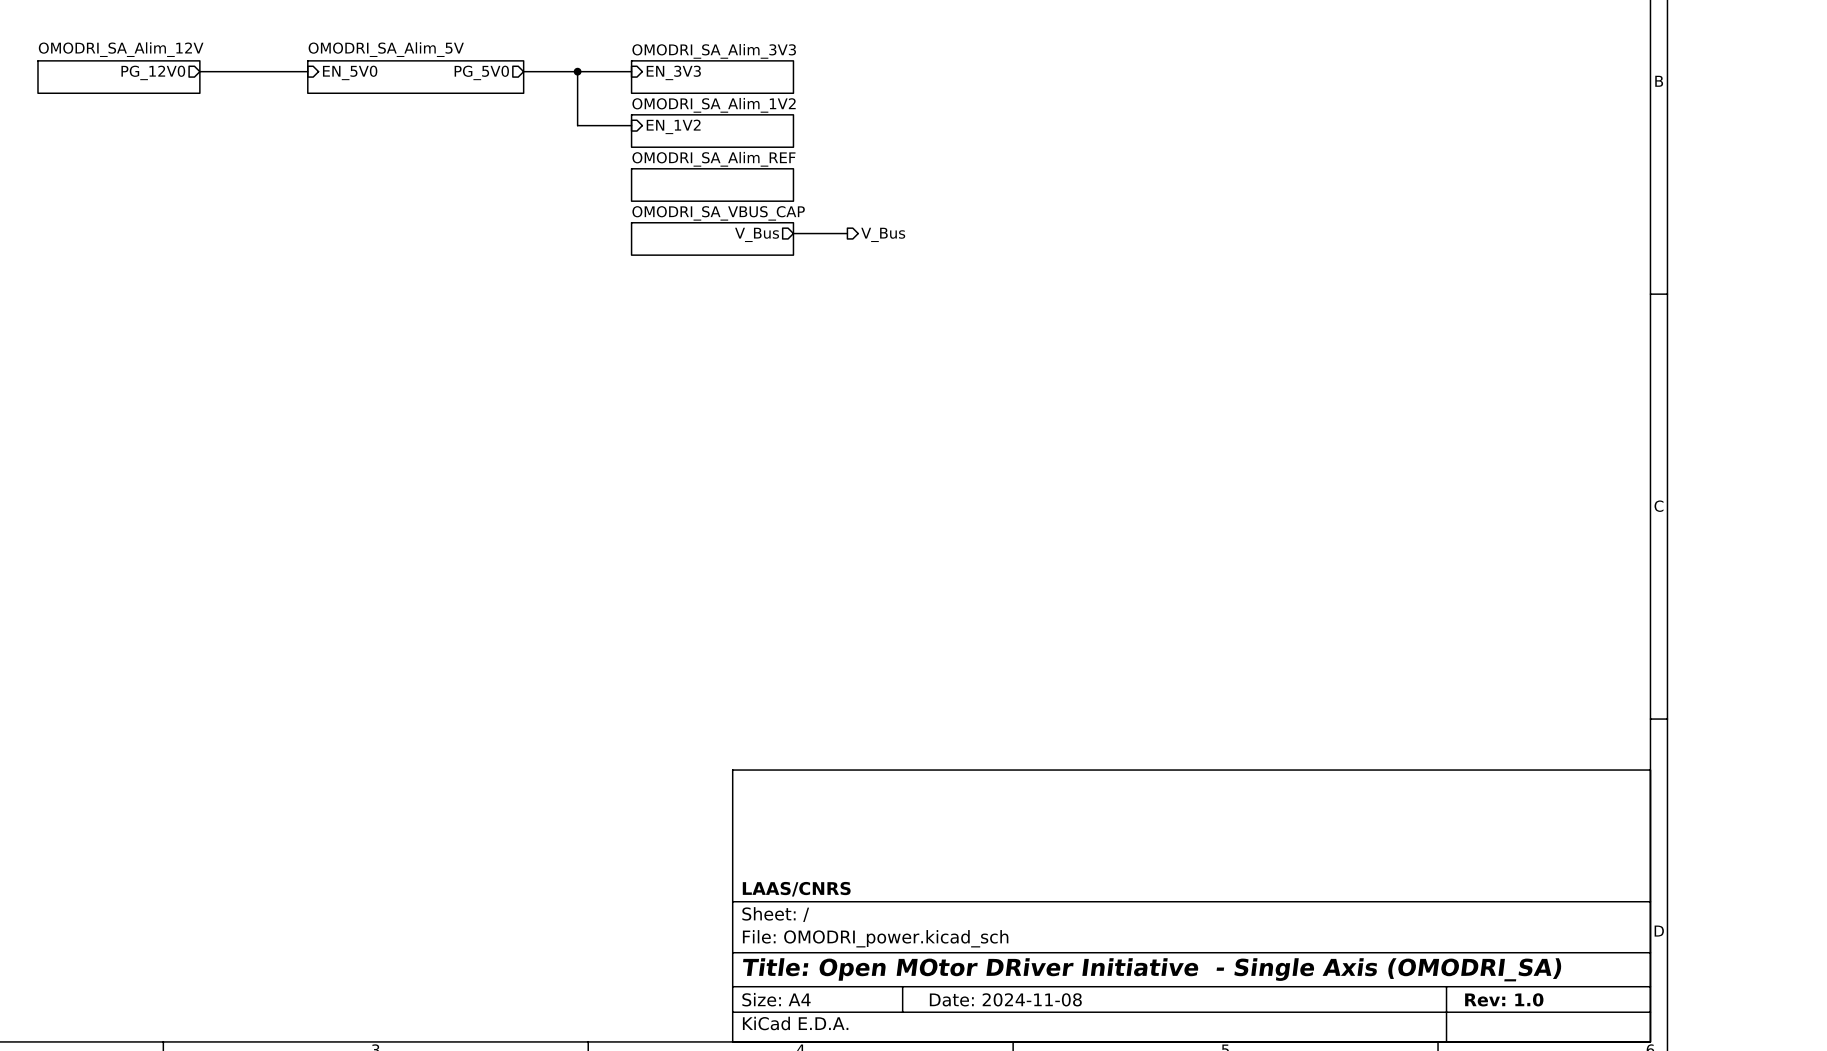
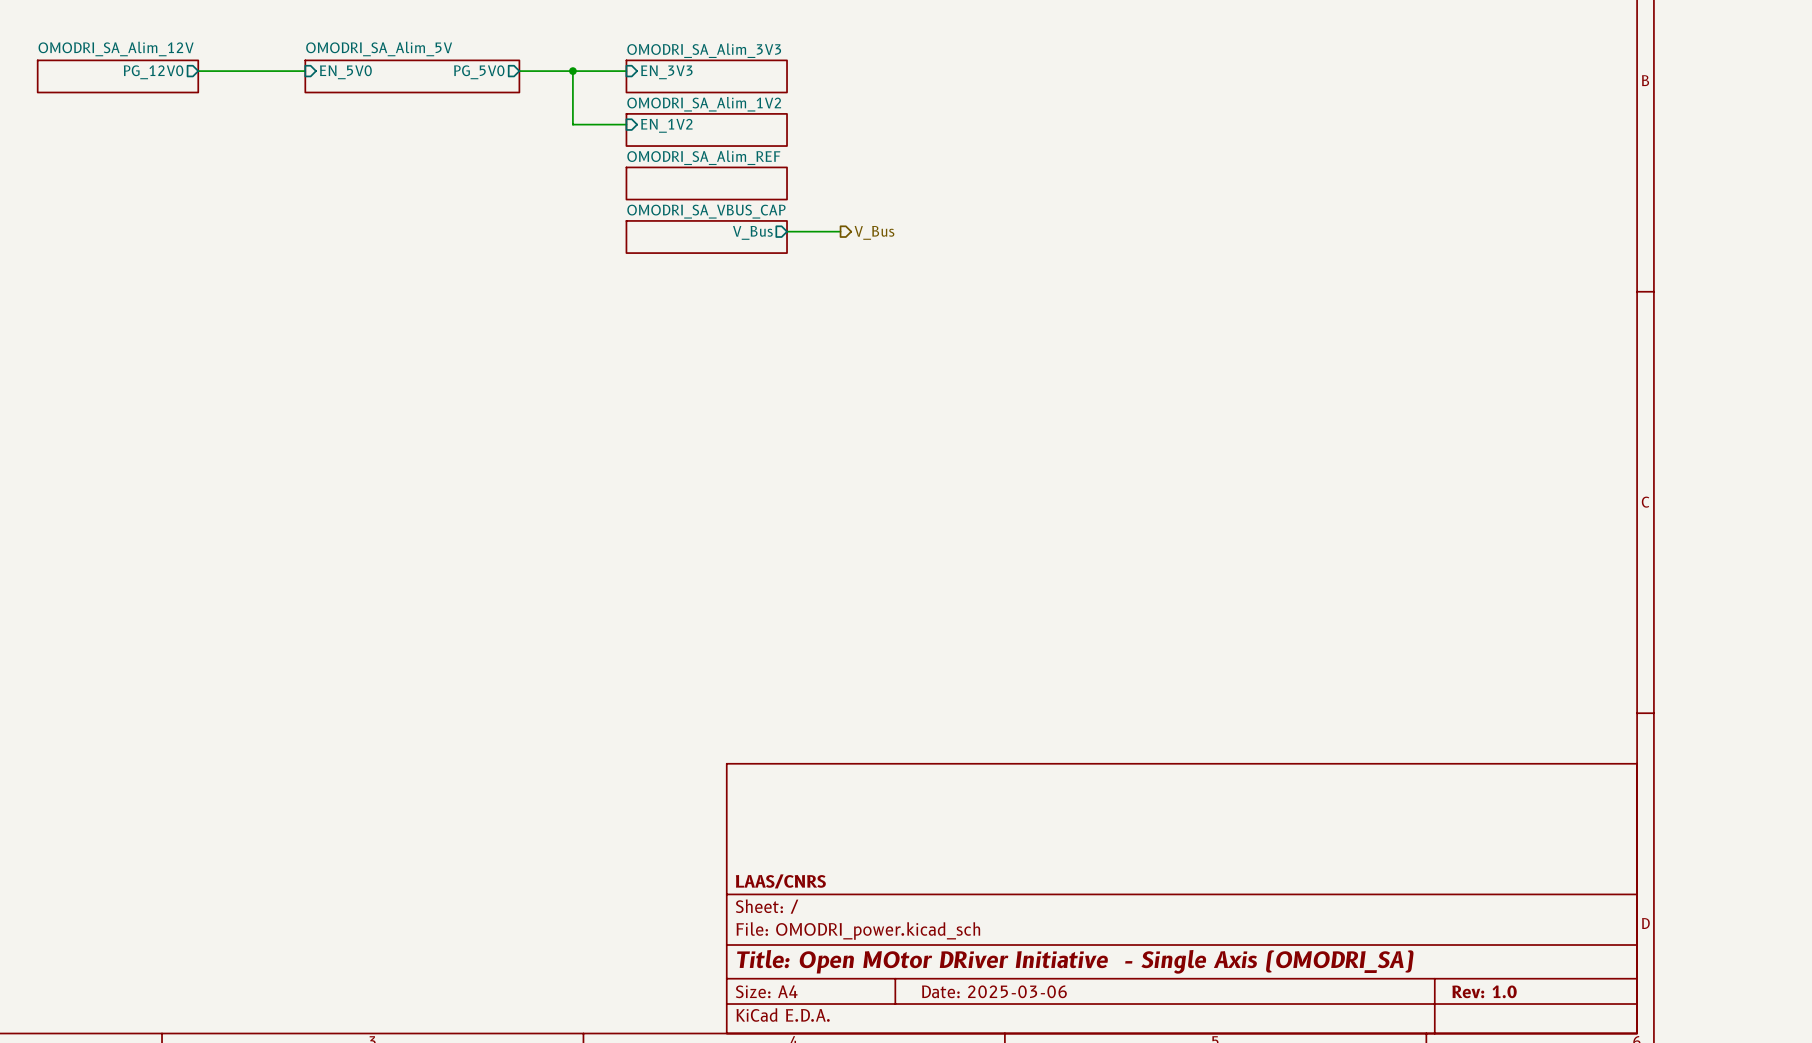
title block: Date: 2024-11-08 (1005, 999) -> Date: 2025-03-06 (994, 991)

